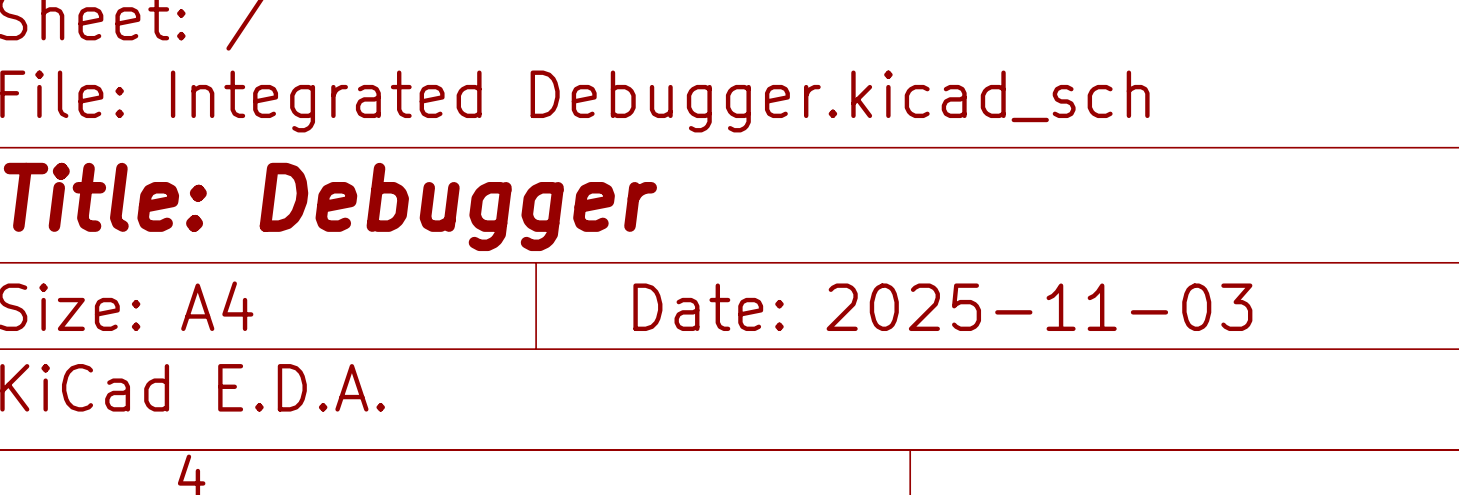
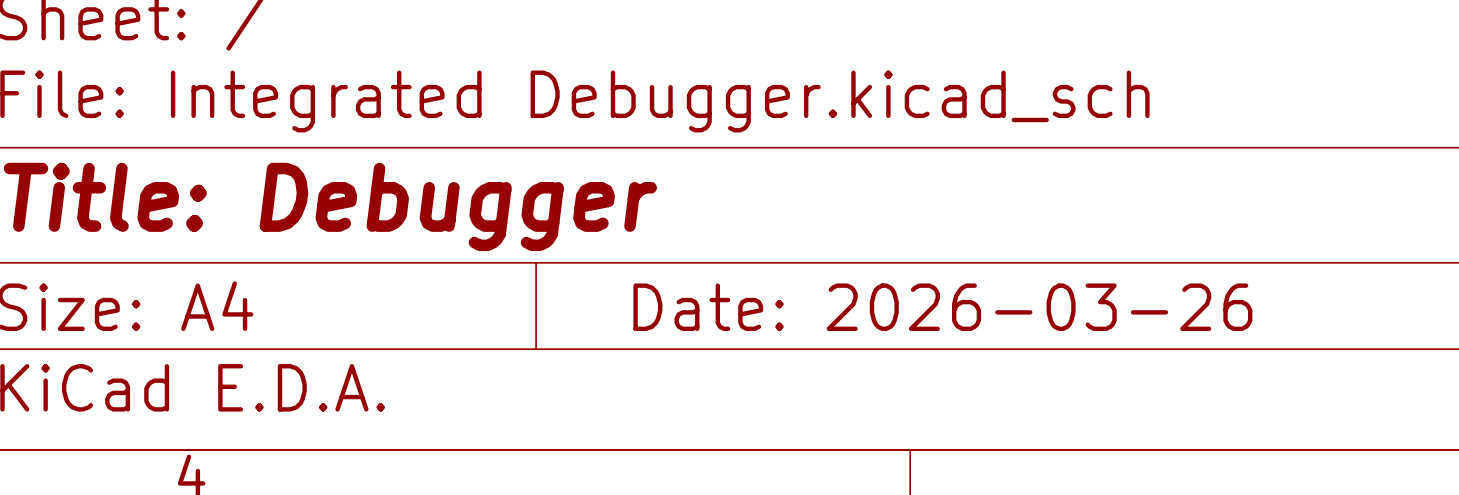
title block: Date: 2025-11-03 (942, 307) -> Date: 2026-03-26 (942, 307)

